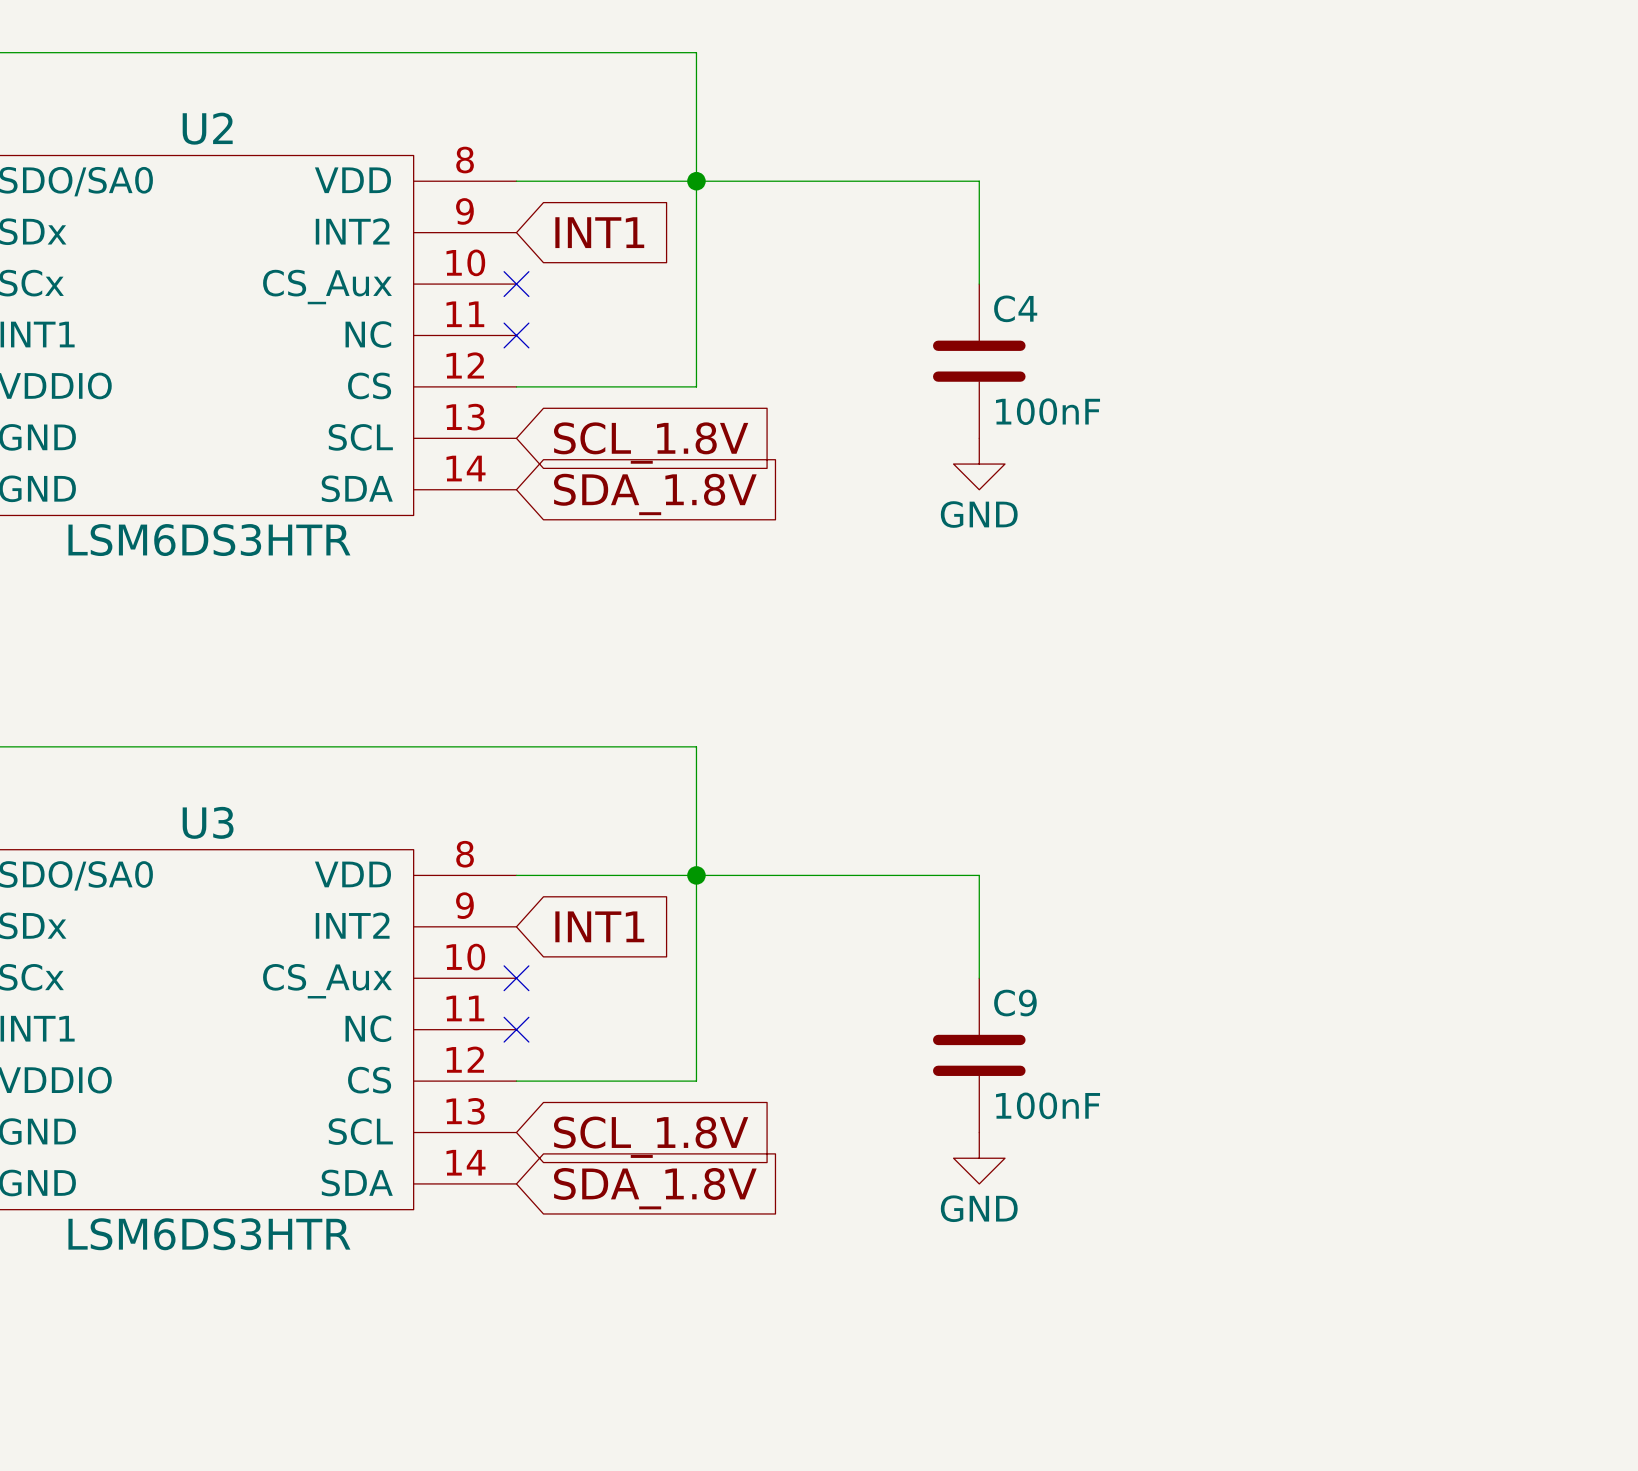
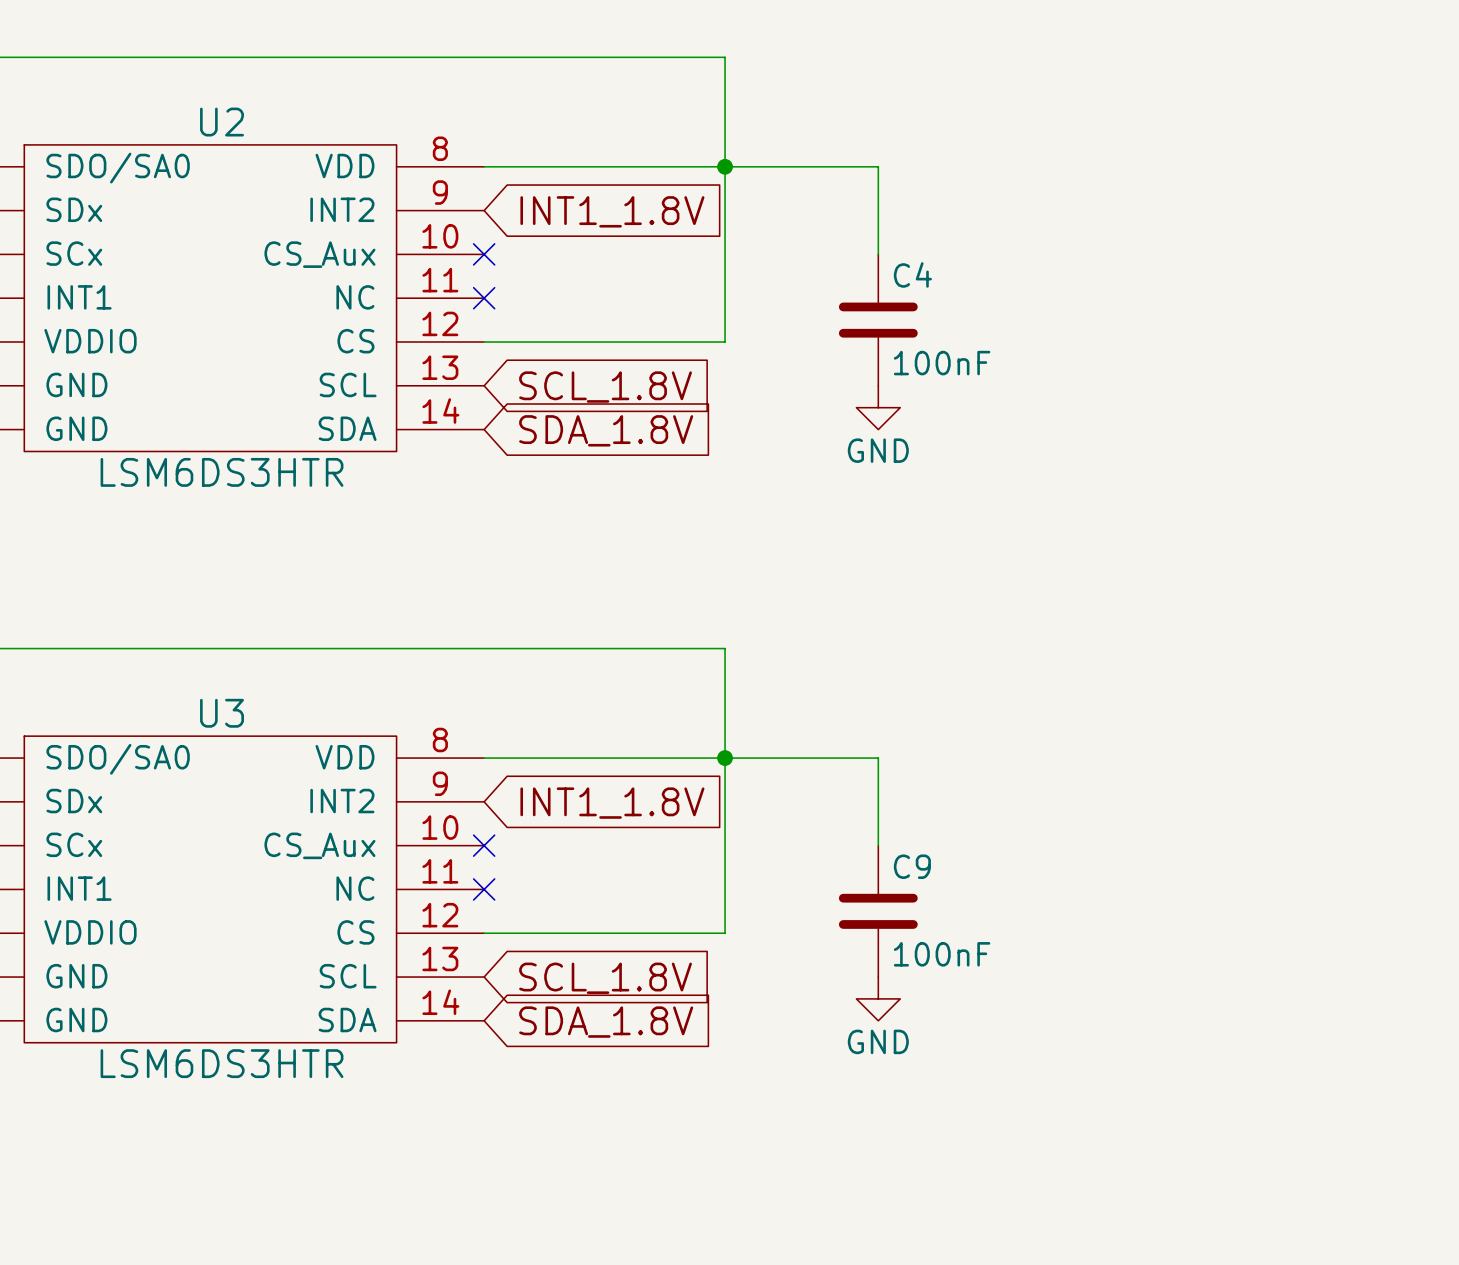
wire: (696, 52) (696, 386) -> (637, 57) (725, 57) (725, 341) (637, 341)
junction position: (696, 181) -> (725, 166)
global label: INT1 (599, 232) -> INT1_1.8V (612, 211)
wire: (696, 746) (696, 1081) -> (637, 648) (725, 648) (725, 933) (637, 933)
junction position: (696, 875) -> (725, 758)
global label: INT1 (599, 926) -> INT1_1.8V (612, 803)

